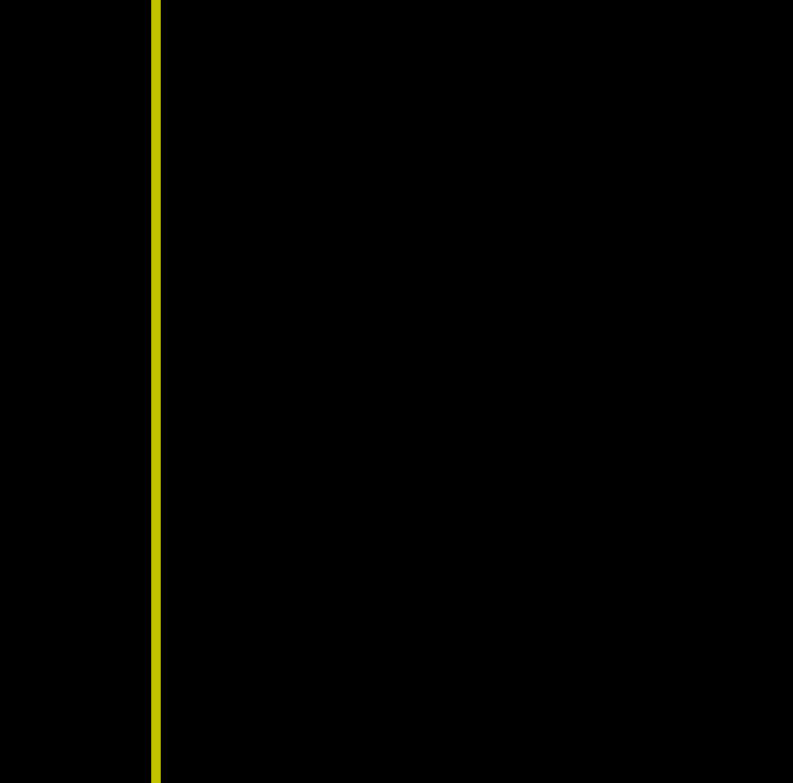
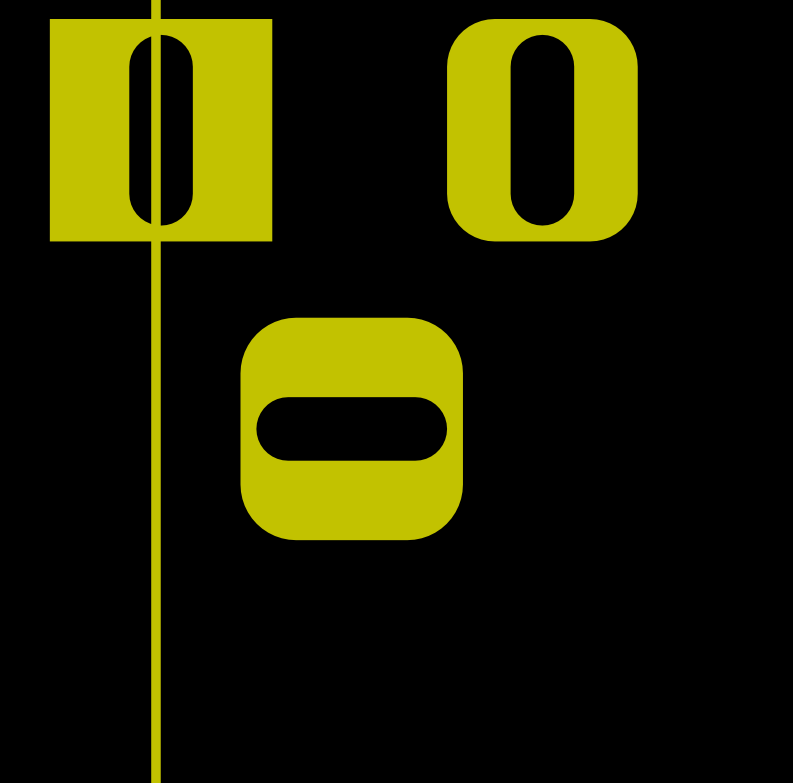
part: none -> (343, 279)

